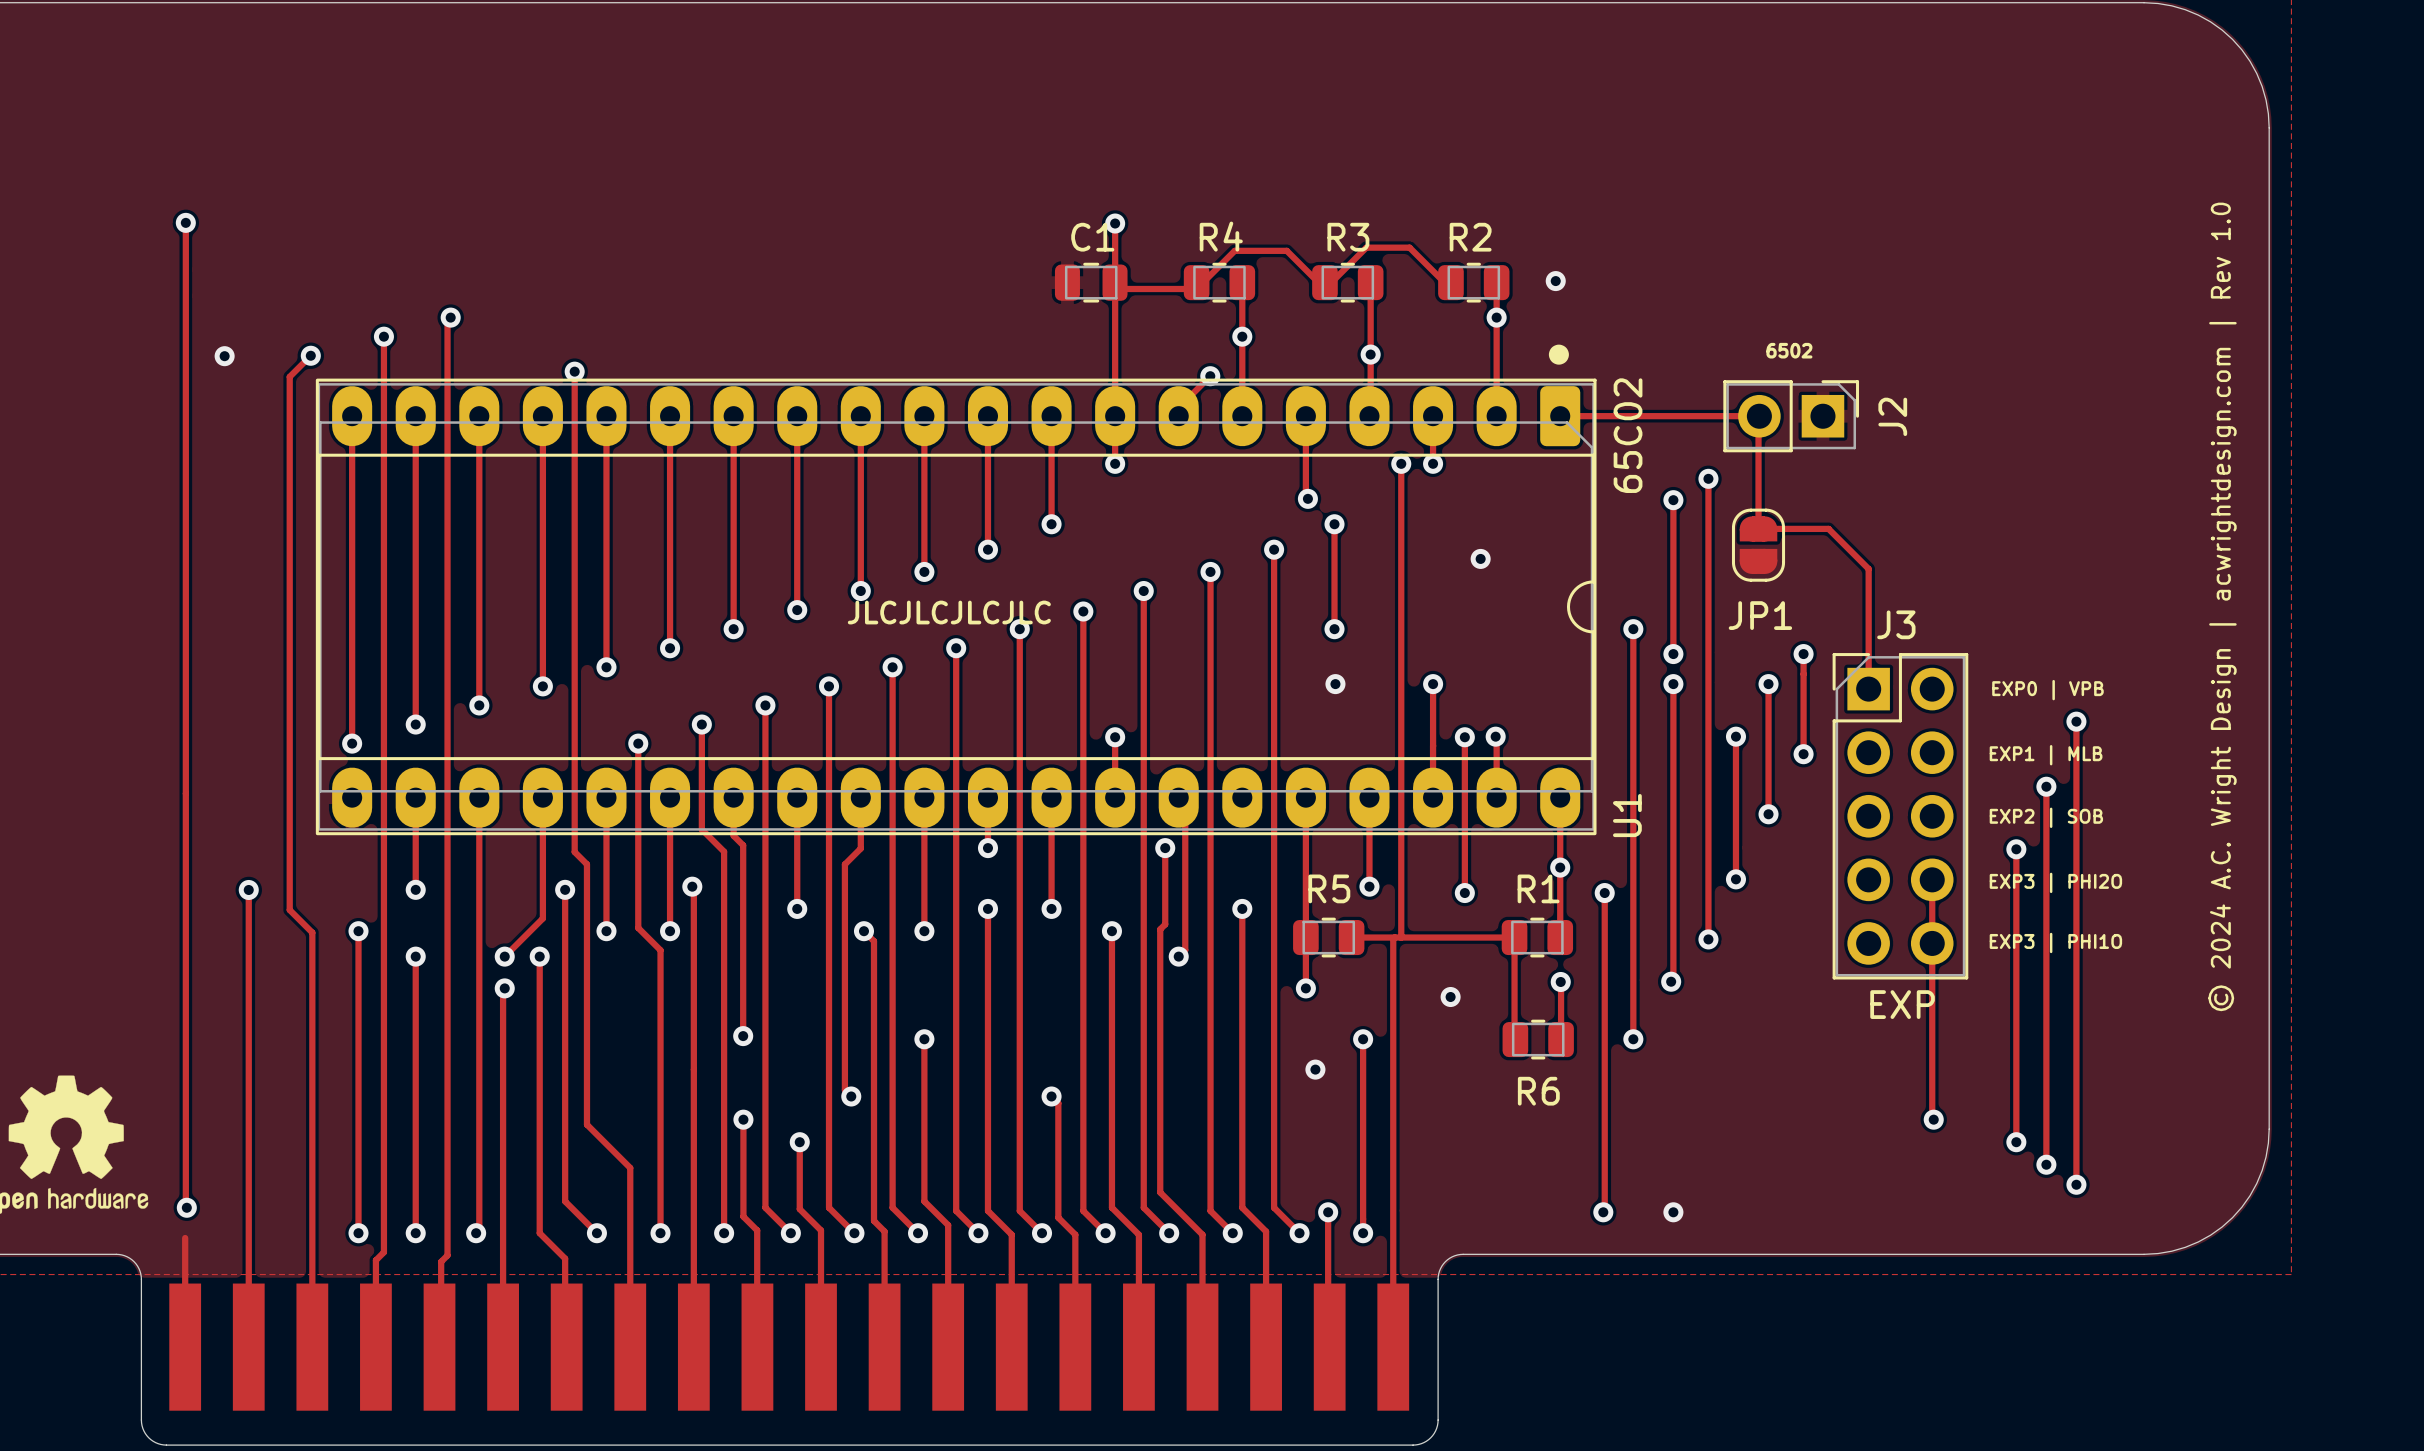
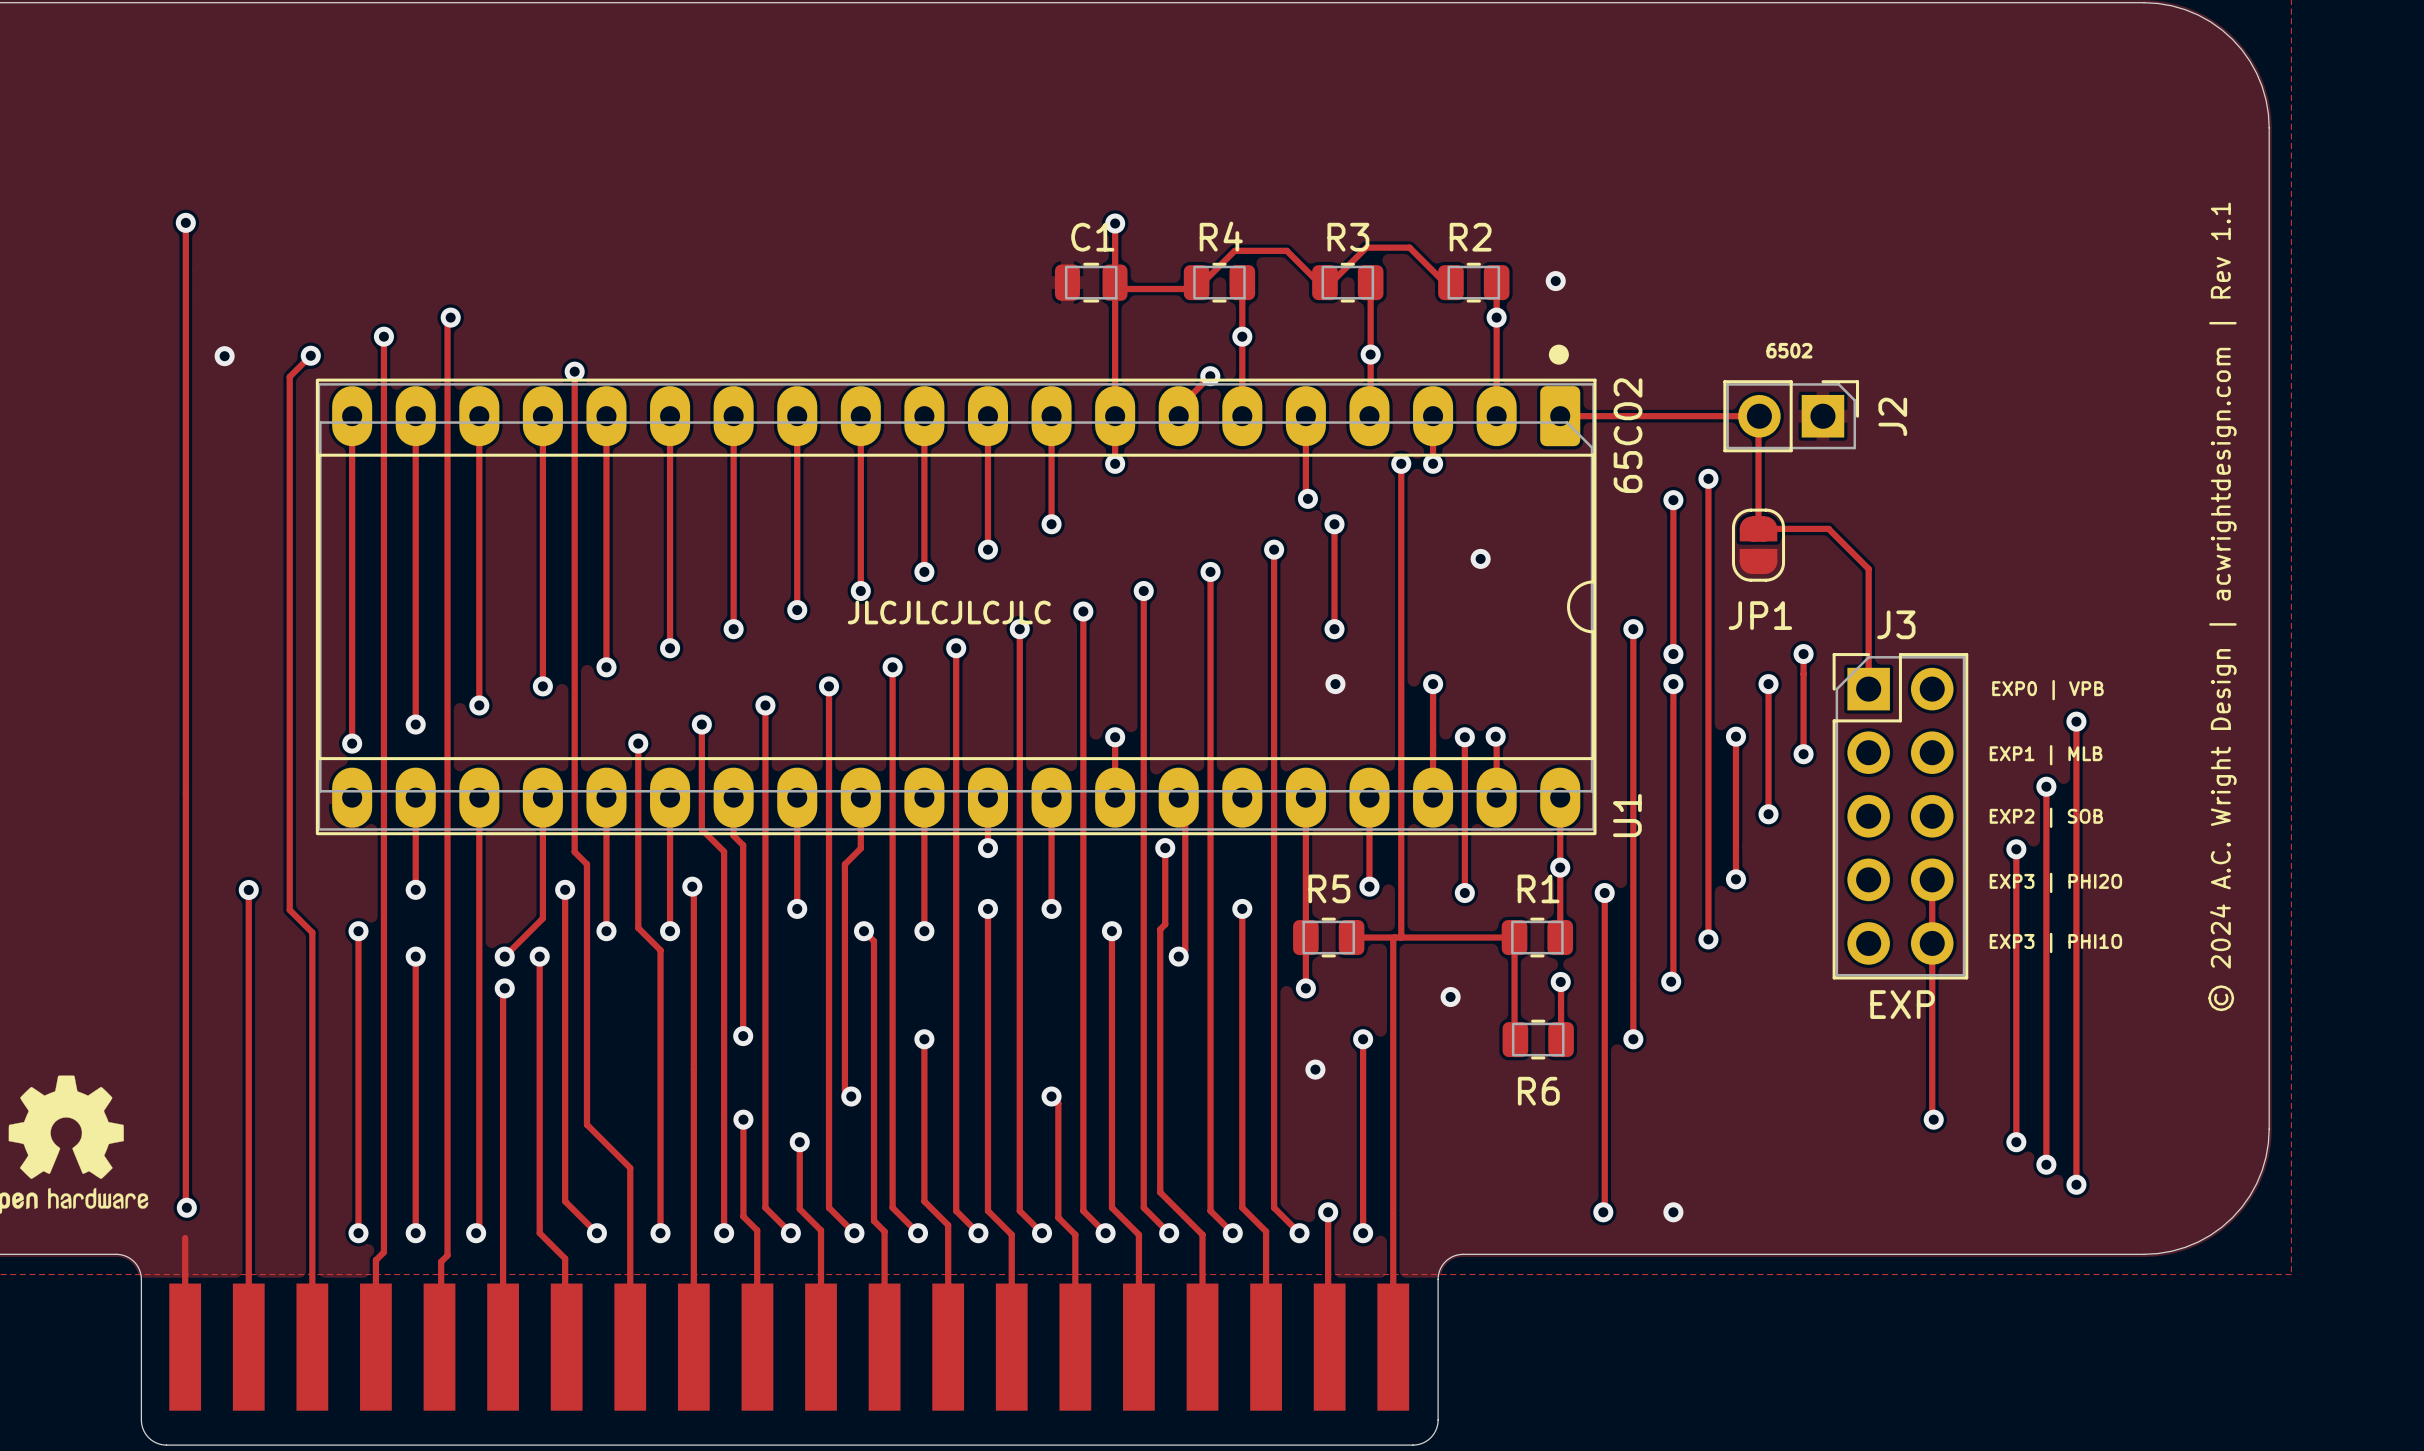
text: © 2024 A.C. Wright Design | acwrightdesign.com | Rev 1.0 (2222, 606) -> © 2024 A.C. Wright Design | acwrightdesign.com | Rev 1.1 (2222, 606)

